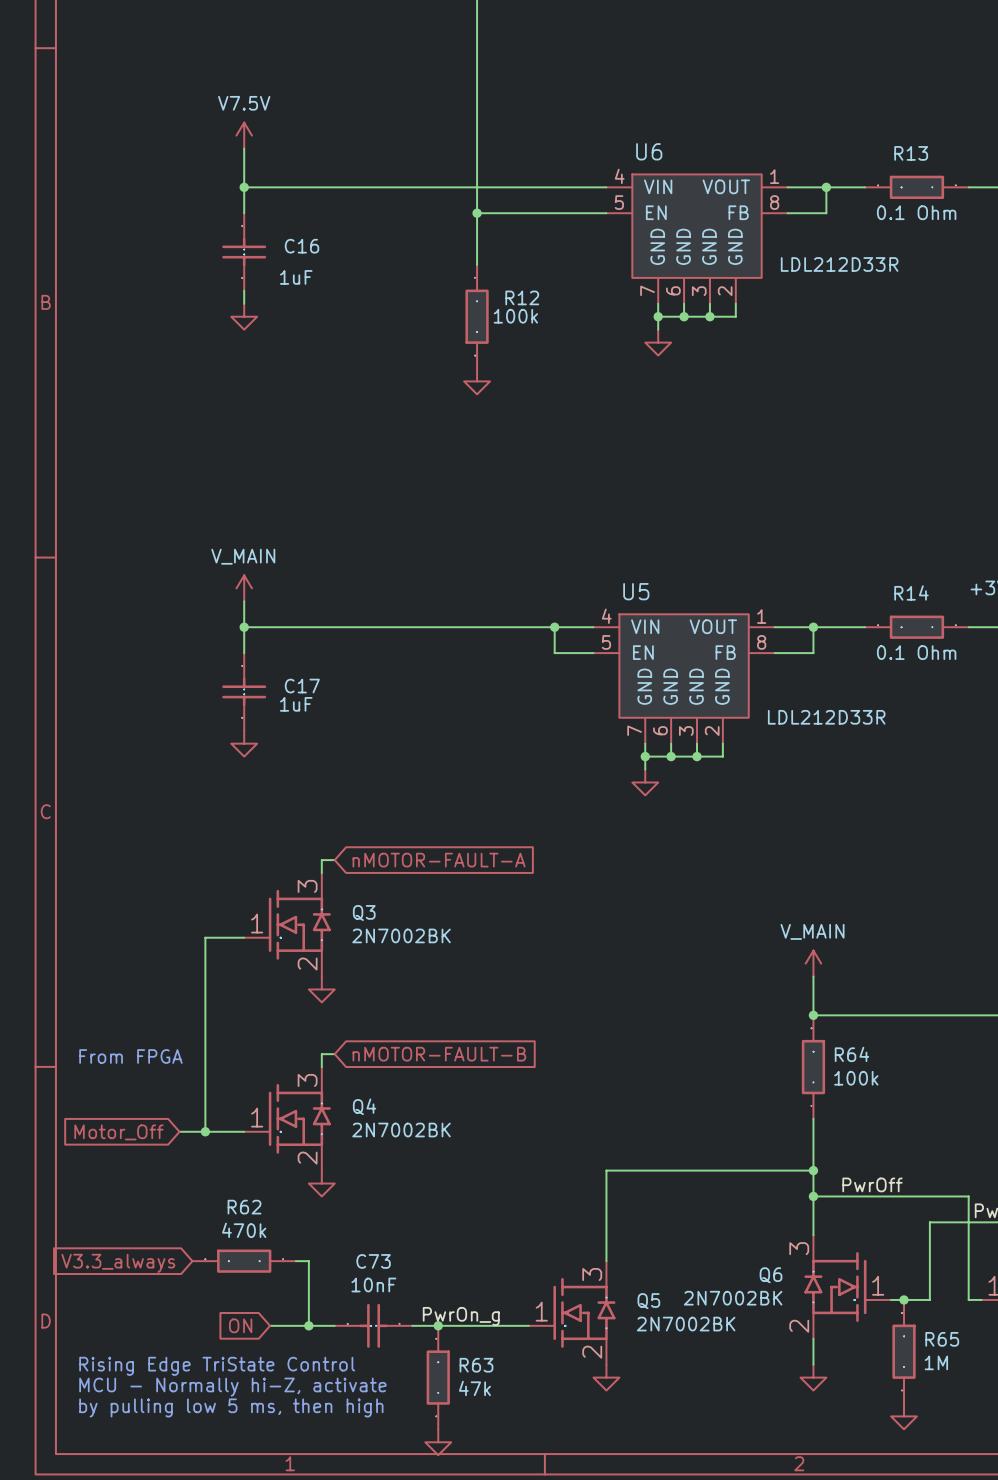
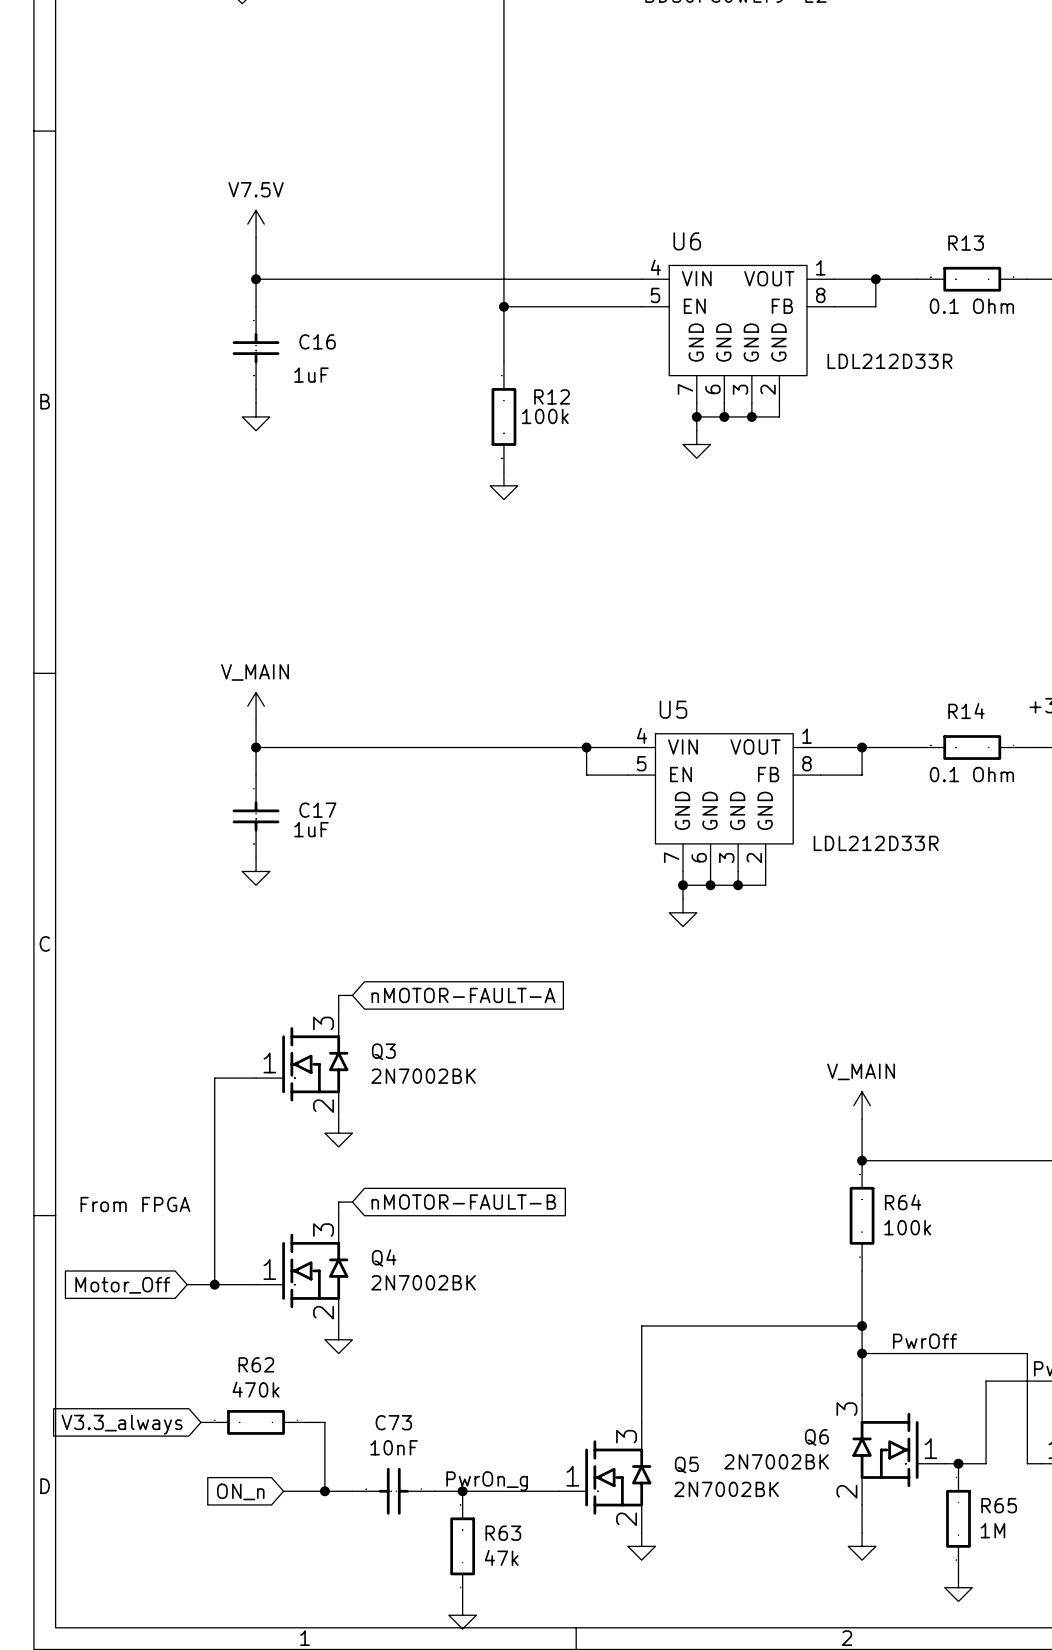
global label: ON (240, 1325) -> ON_n (240, 1491)
text: Rising Edge TriState Control (217, 1366) -> none
text: MCU - Normally hi-Z, activate (232, 1387) -> none
text: by pulling low 5 ms, then high (231, 1407) -> none

